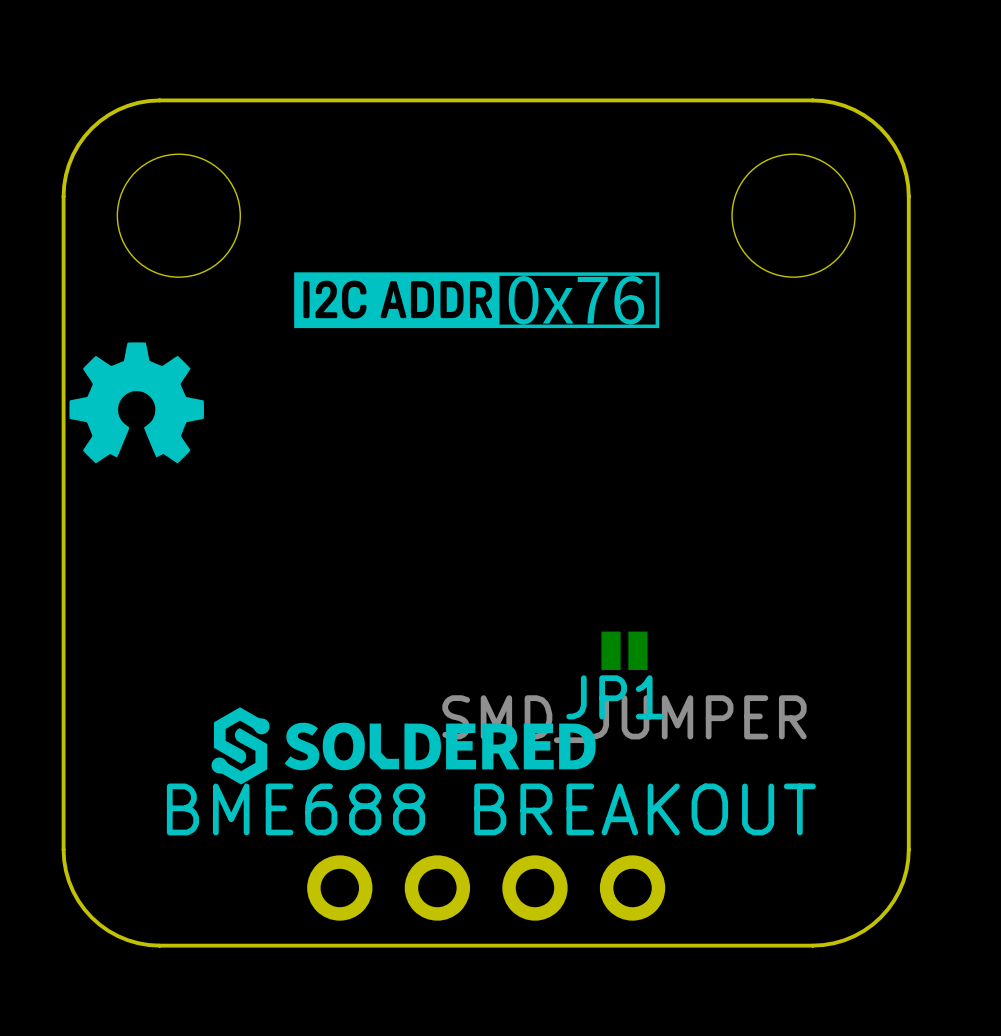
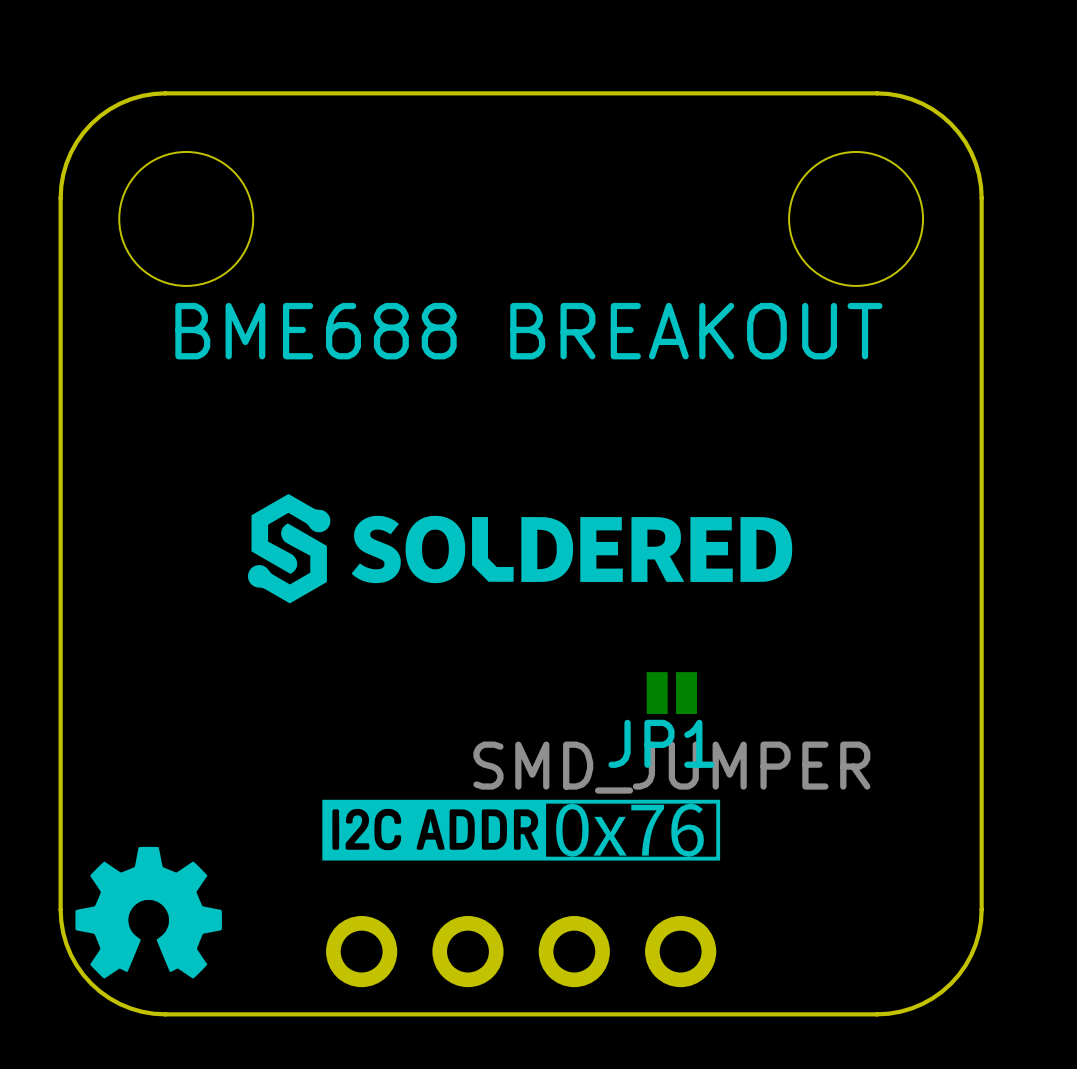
drawing position: (476, 300) -> (521, 830)
drawing position: (576, 300) -> (629, 830)
drawing position: (136, 402) -> (148, 912)
drawing: none -> [248, 494, 793, 604]
drawing: [211, 707, 596, 785] -> none
text position: BME688 BREAKOUT (491, 809) -> BME688 BREAKOUT (528, 331)

